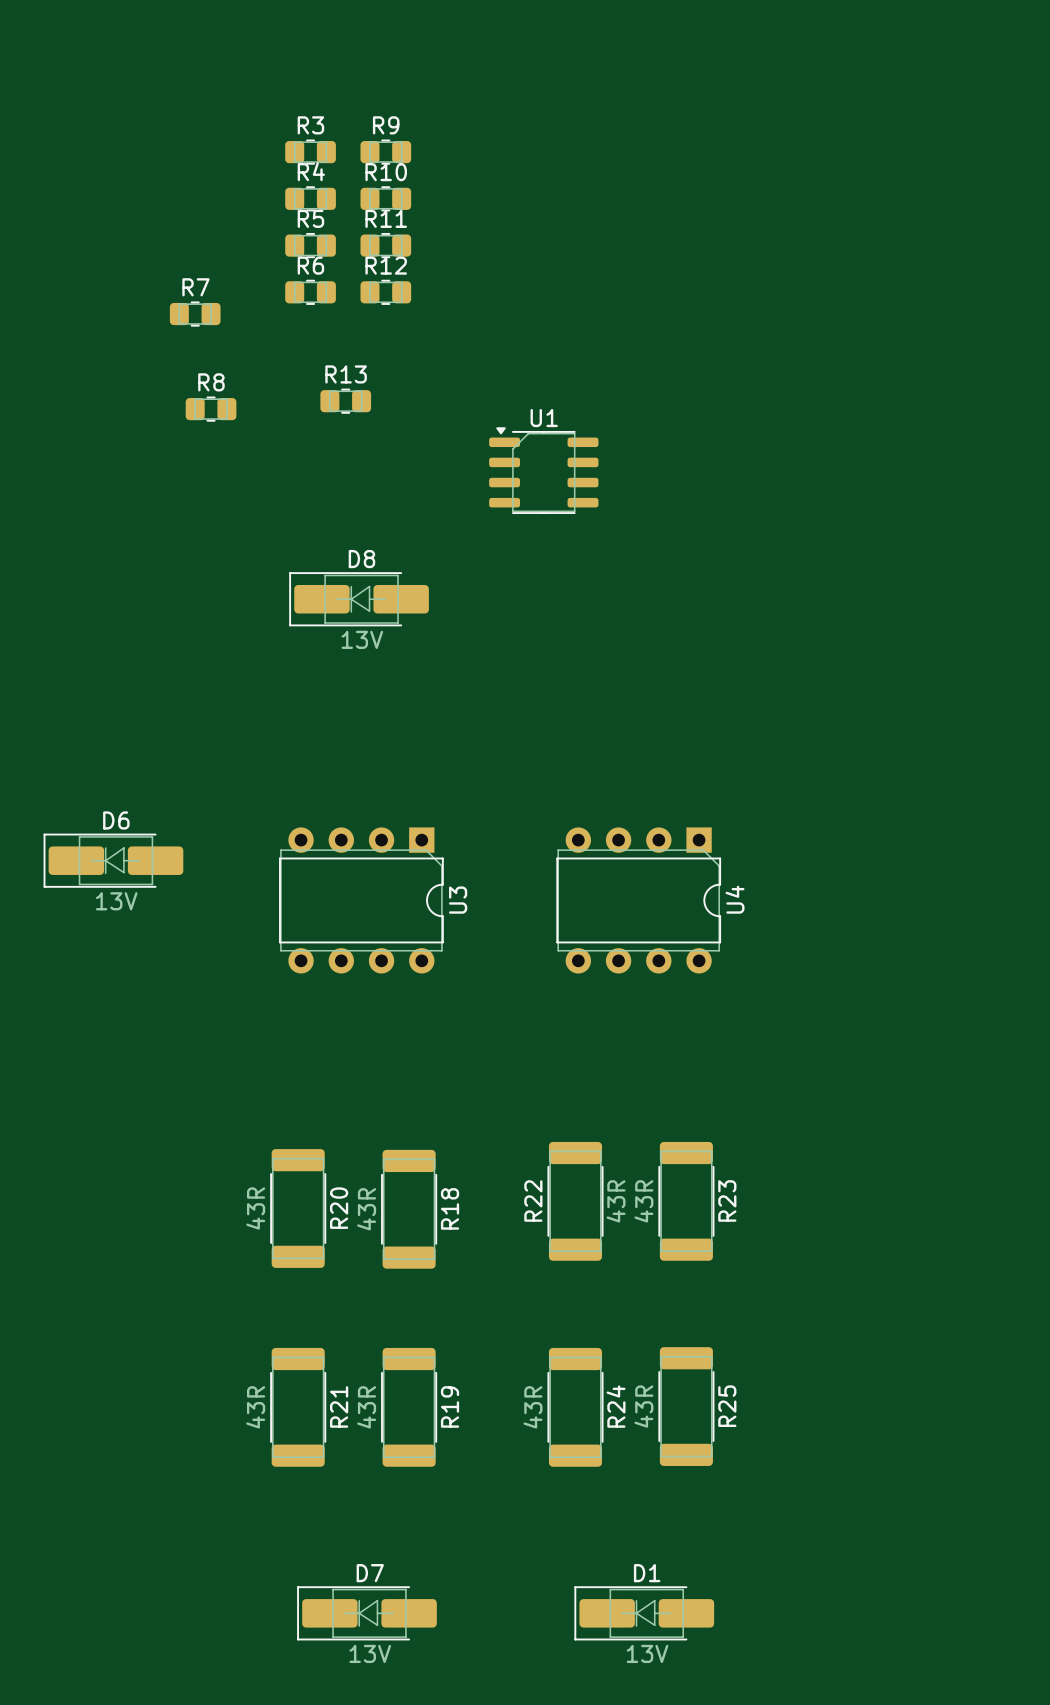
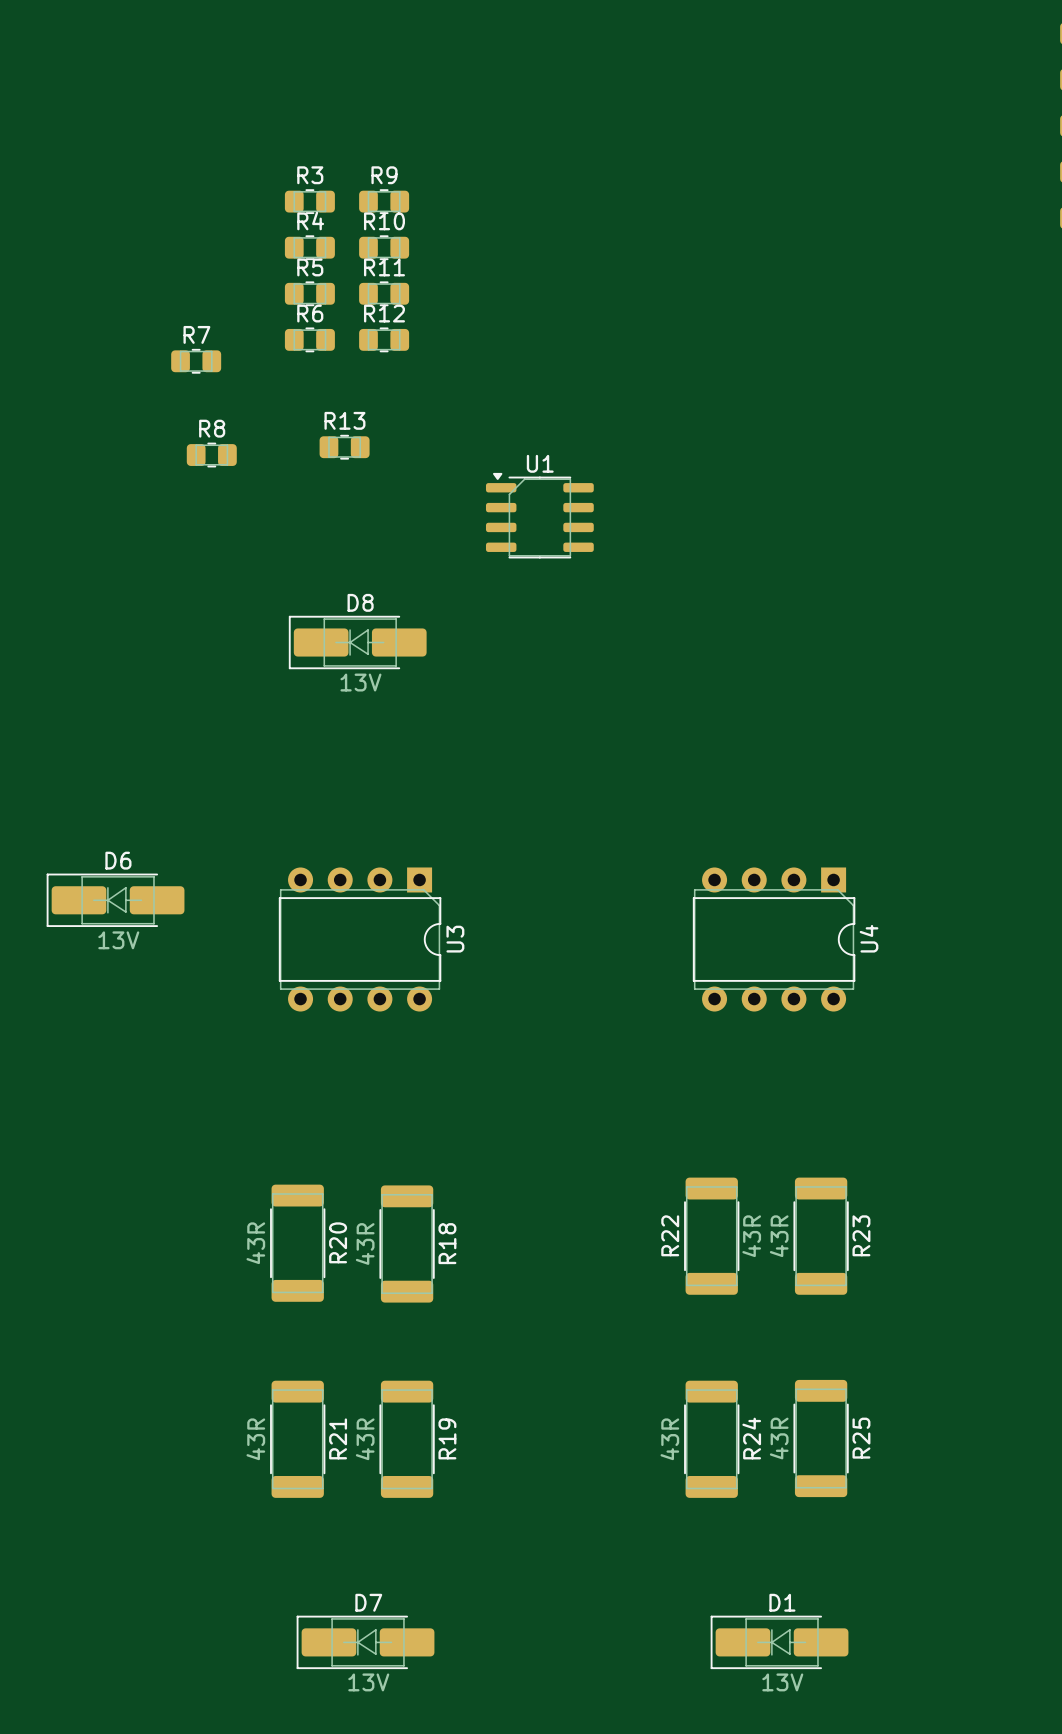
U4 position: (638, 900) -> (774, 939)
R22 position: (575, 1201) -> (711, 1236)
R23 position: (686, 1201) -> (821, 1236)
R25 position: (686, 1406) -> (821, 1438)
R24 position: (575, 1407) -> (711, 1439)
D1 position: (644, 1613) -> (779, 1642)

